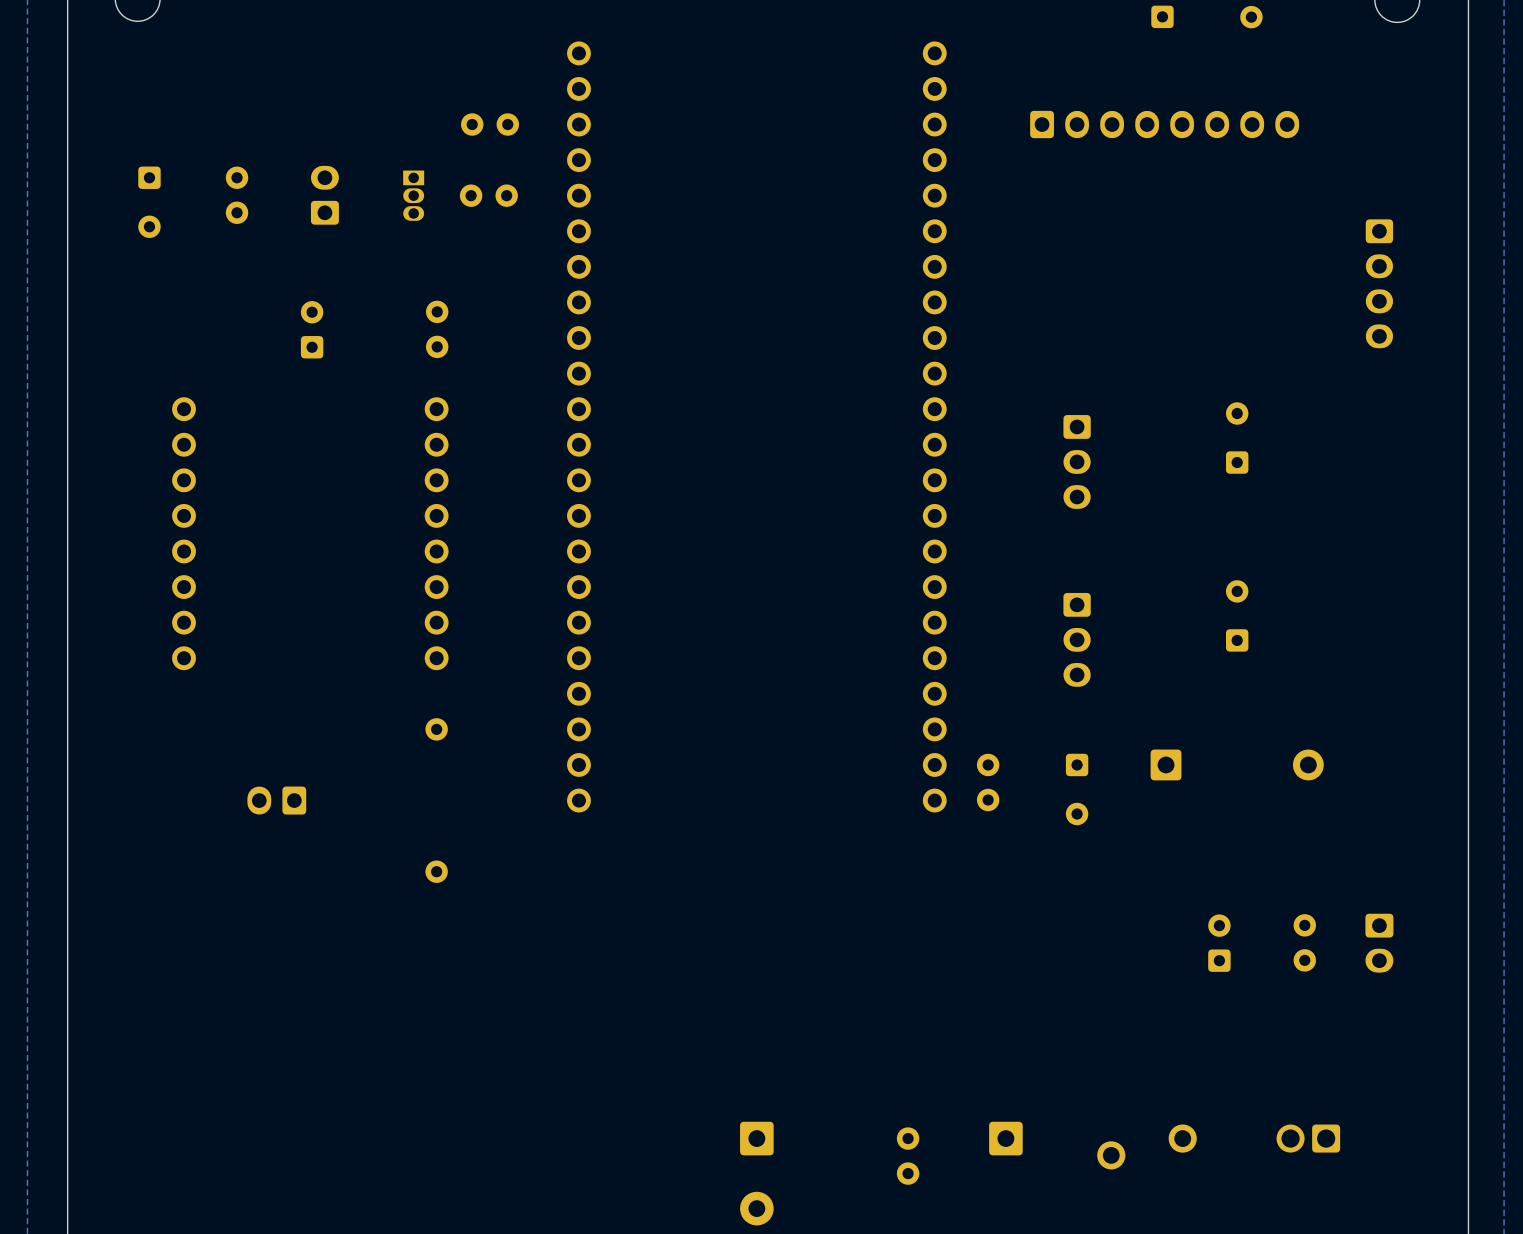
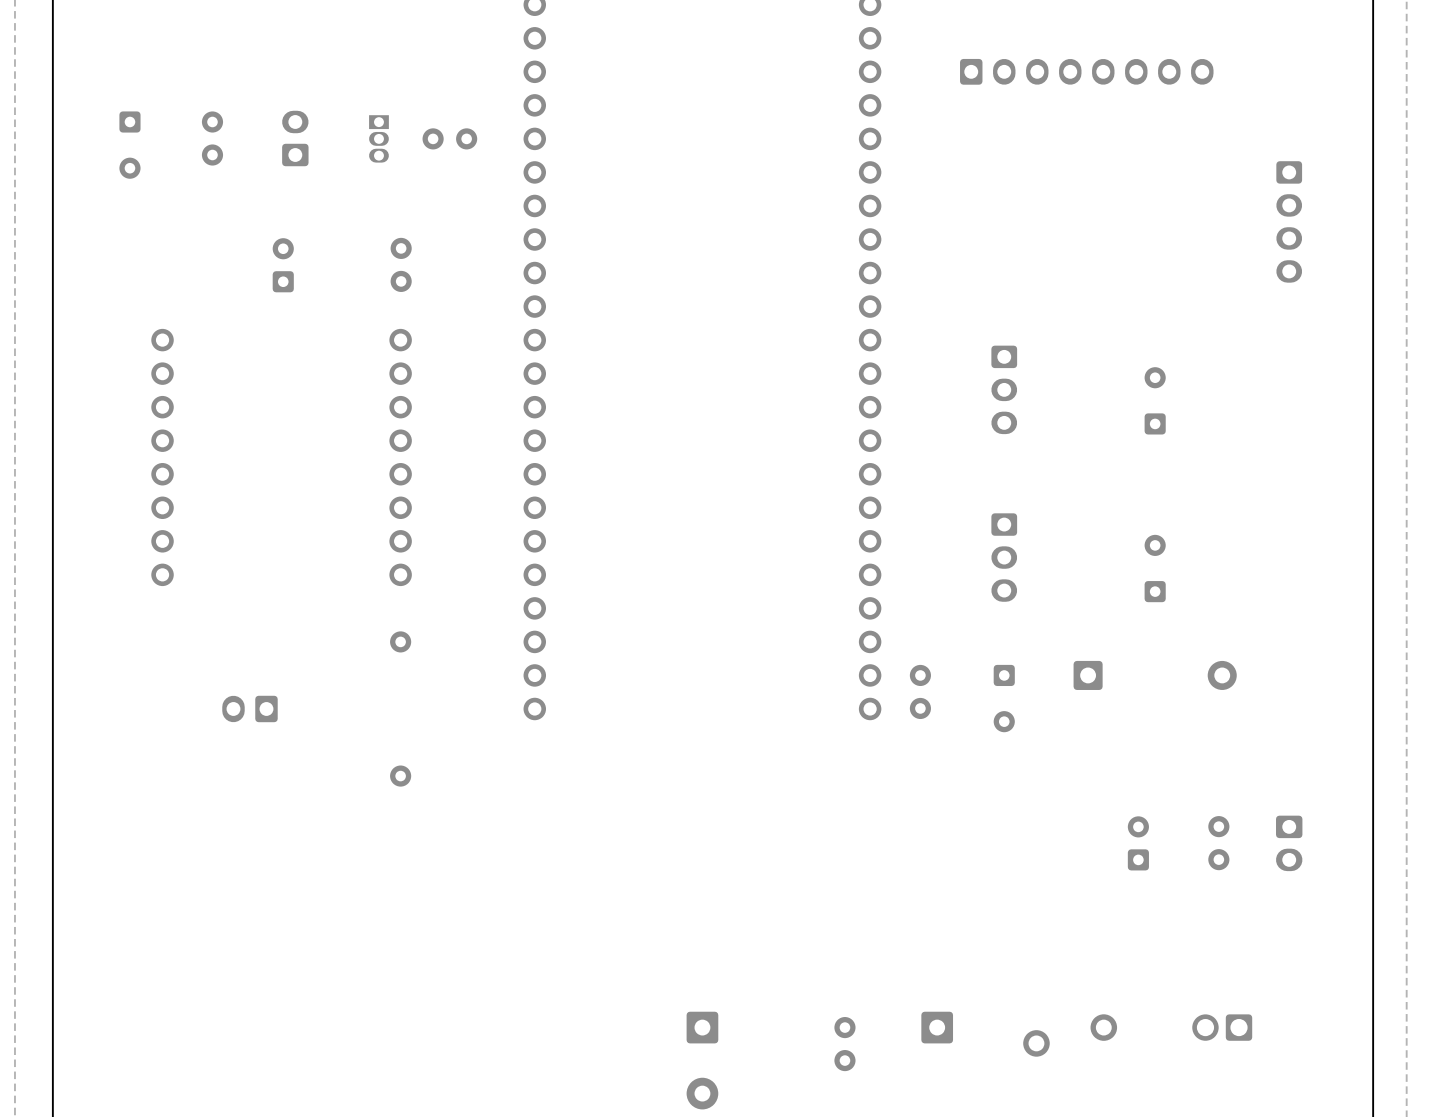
part: (490, 124) -> none
part position: (1237, 438) -> (1155, 400)
part position: (1237, 615) -> (1155, 568)

